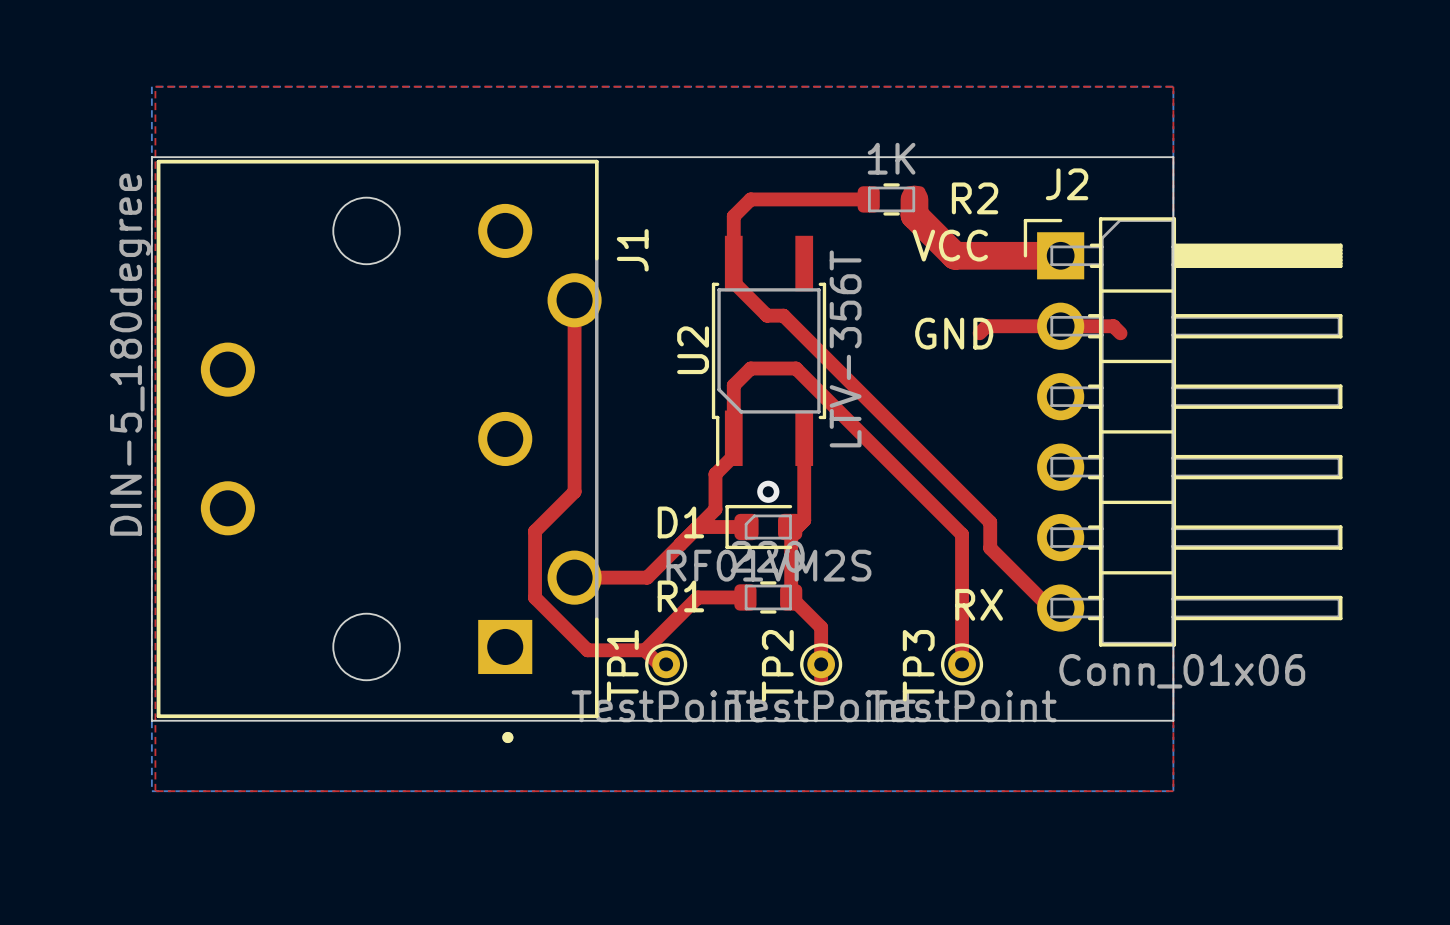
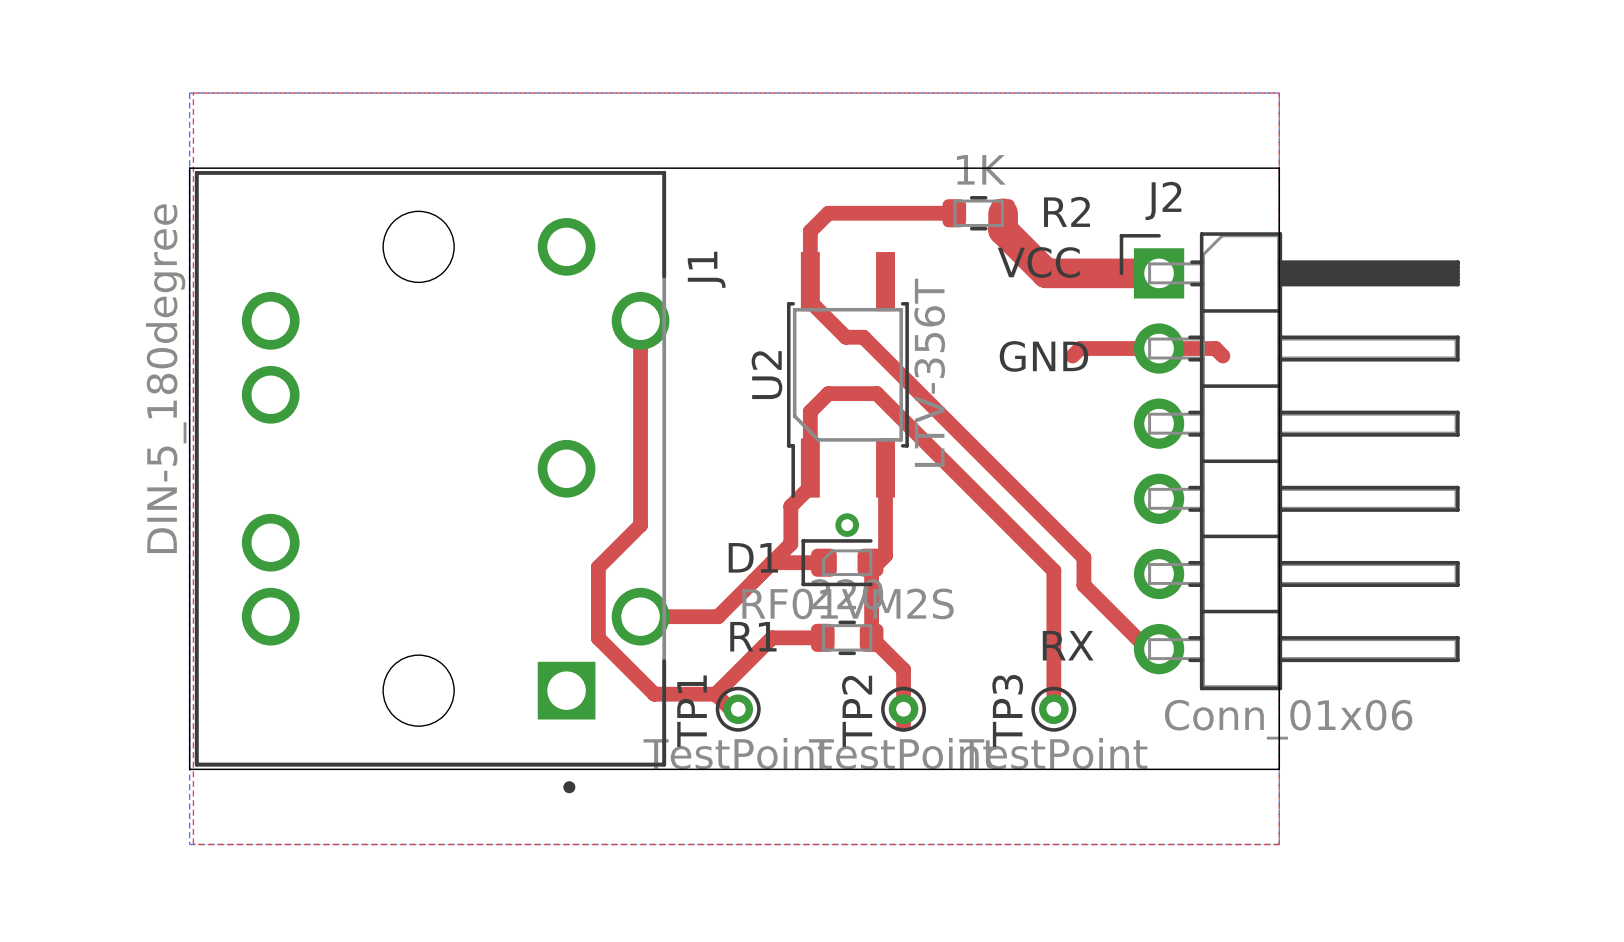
J1 footprint: [156, 159, 602, 744] -> [194, 171, 670, 794]

